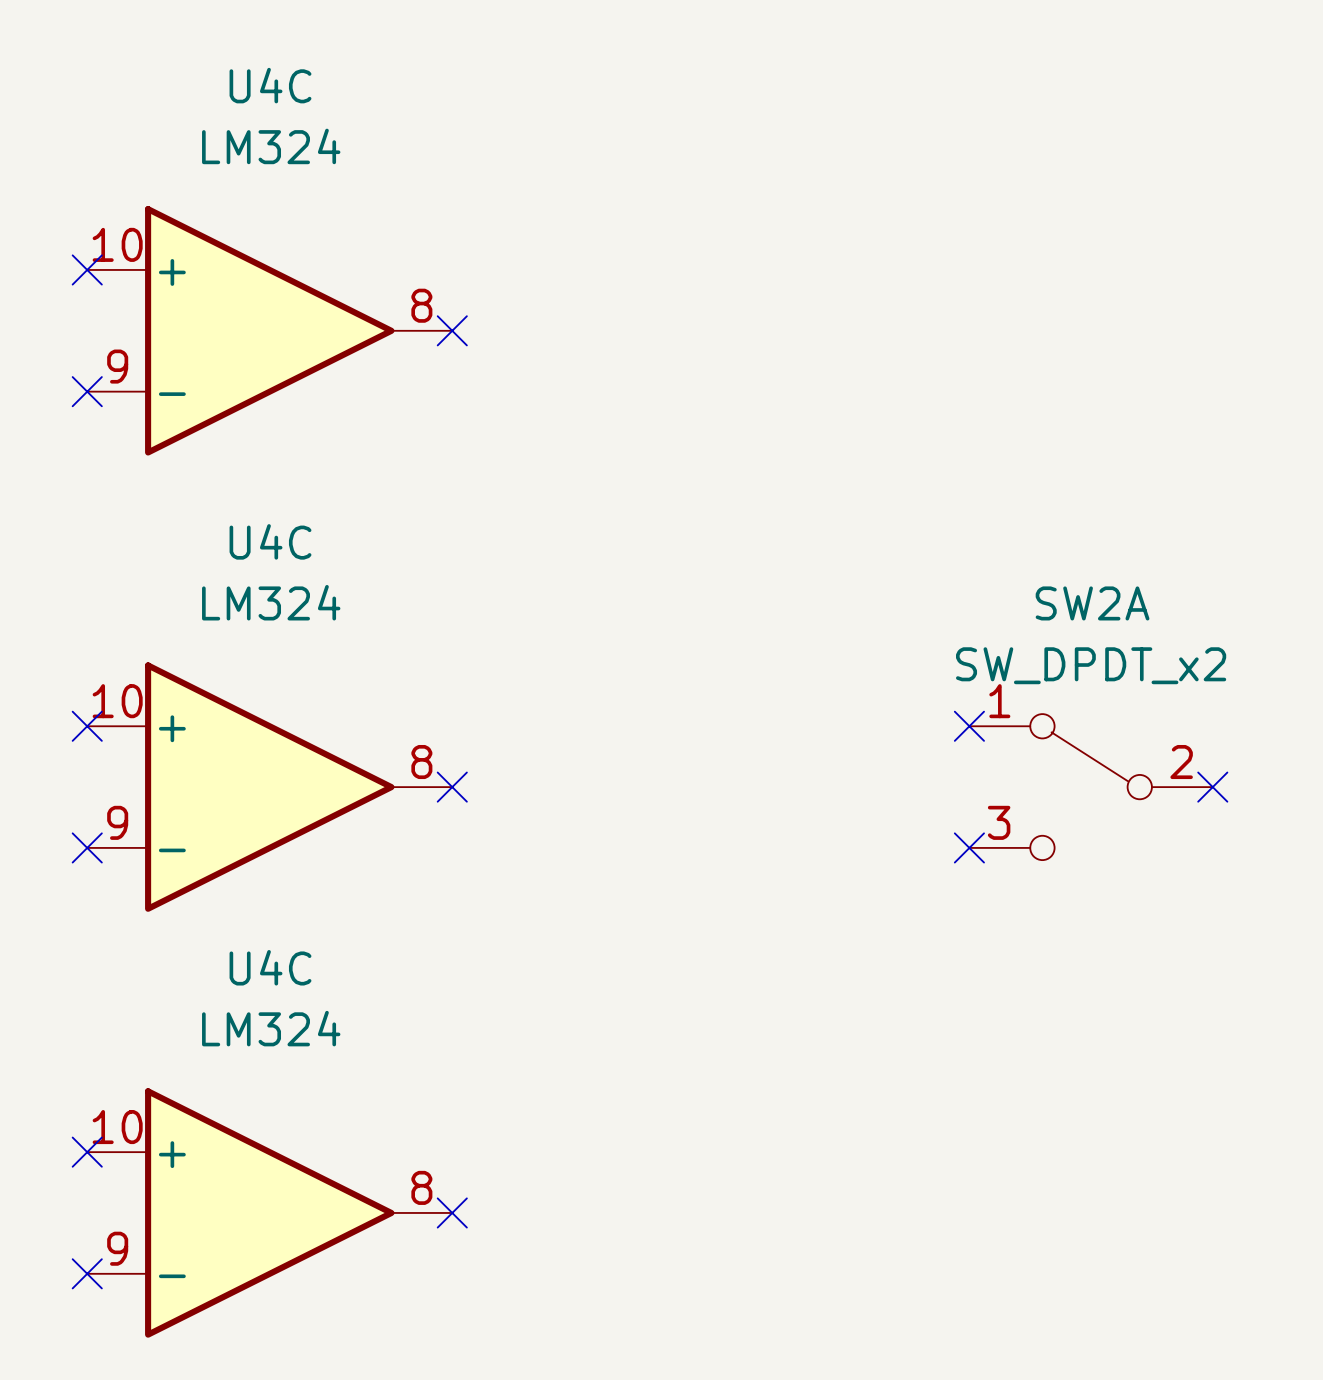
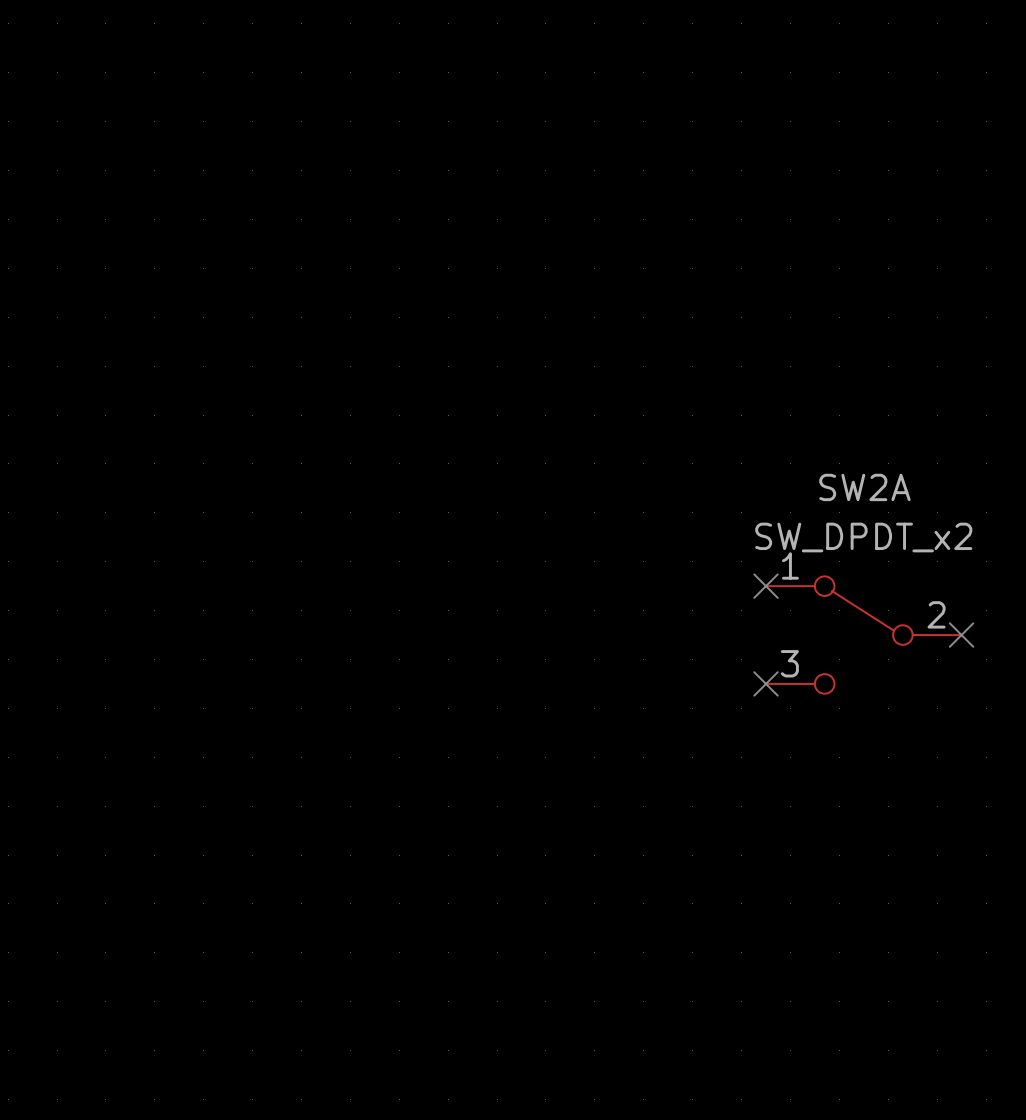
no-connect mark: (87, 269) -> none
U4C: LM324 (269, 330) -> none
no-connect mark: (452, 330) -> none
no-connect mark: (87, 391) -> none
no-connect mark: (87, 726) -> none
U4C: LM324 (269, 787) -> none
no-connect mark: (452, 787) -> none
no-connect mark: (87, 847) -> none
no-connect mark: (87, 1152) -> none
U4C: LM324 (269, 1212) -> none
no-connect mark: (452, 1212) -> none
no-connect mark: (87, 1273) -> none

